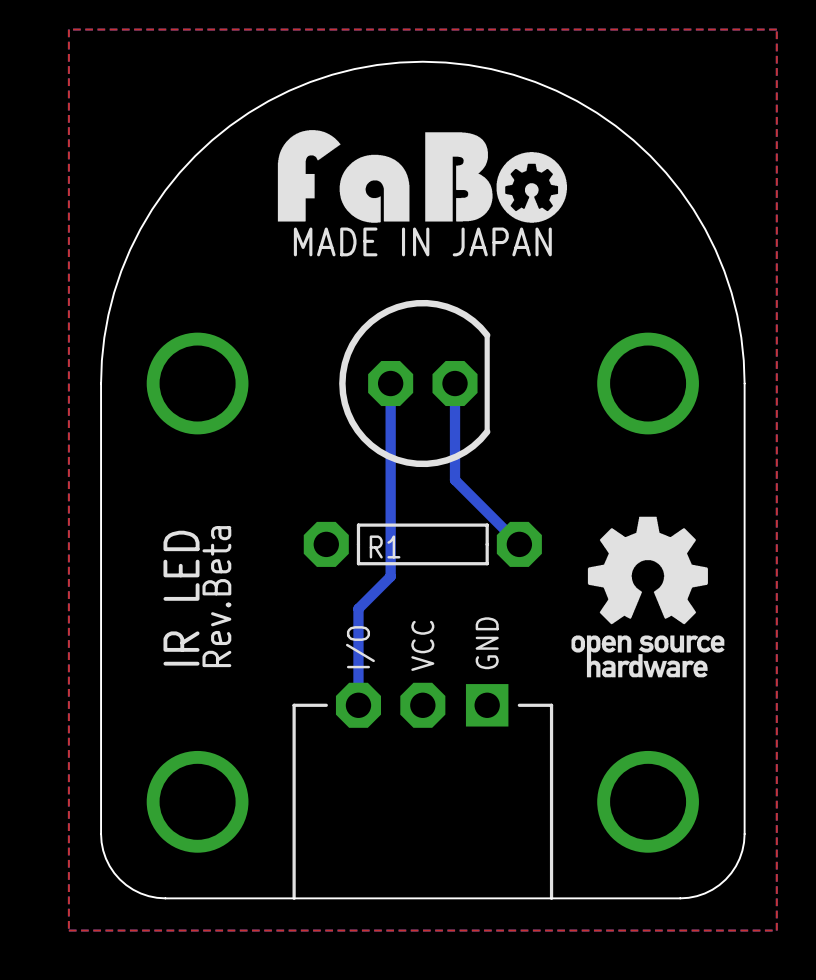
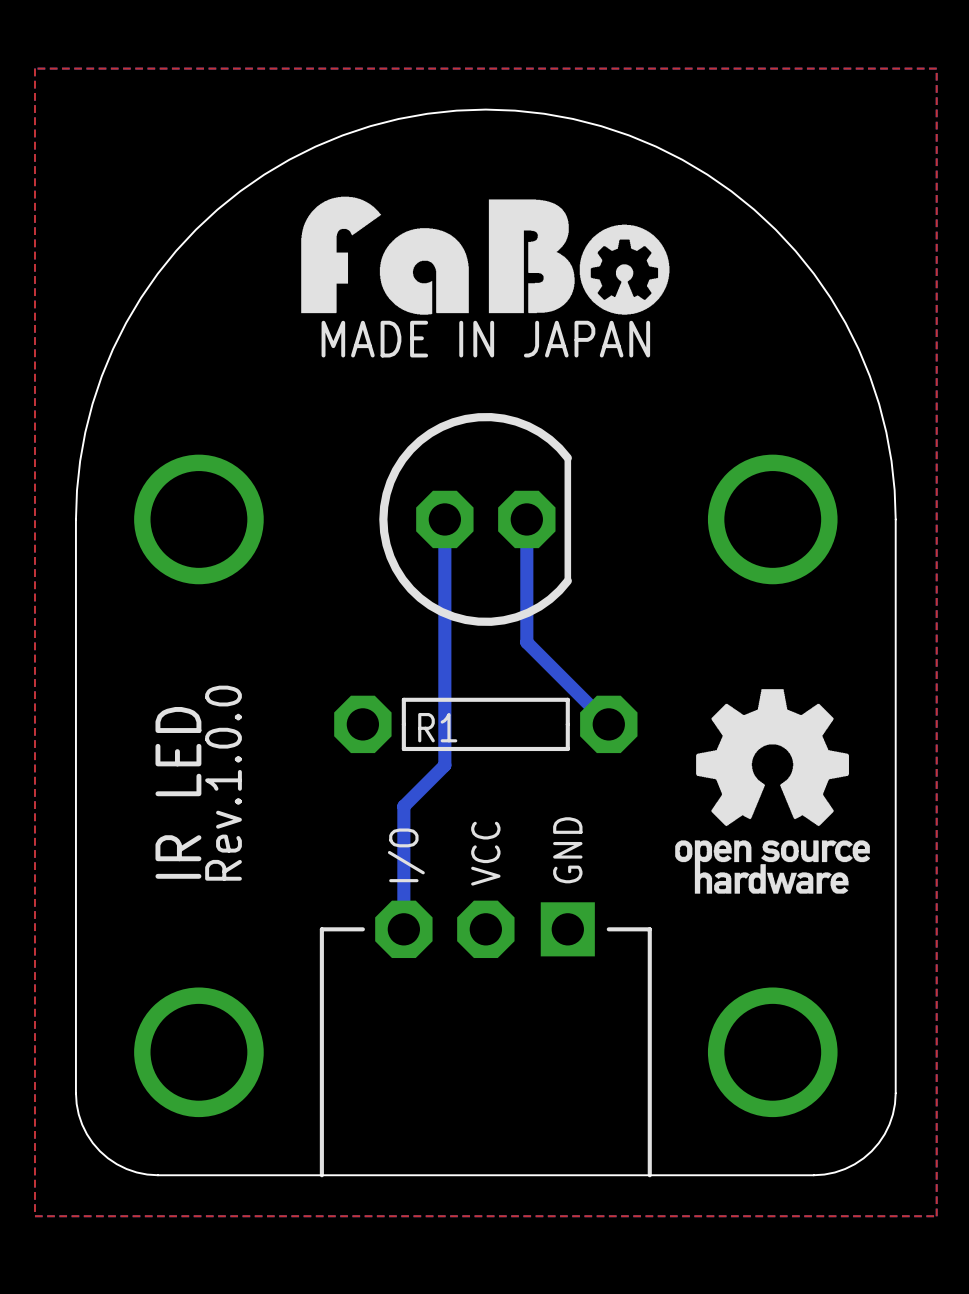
text: Rev.Beta (216, 596) -> Rev.1.0.0 (223, 783)

